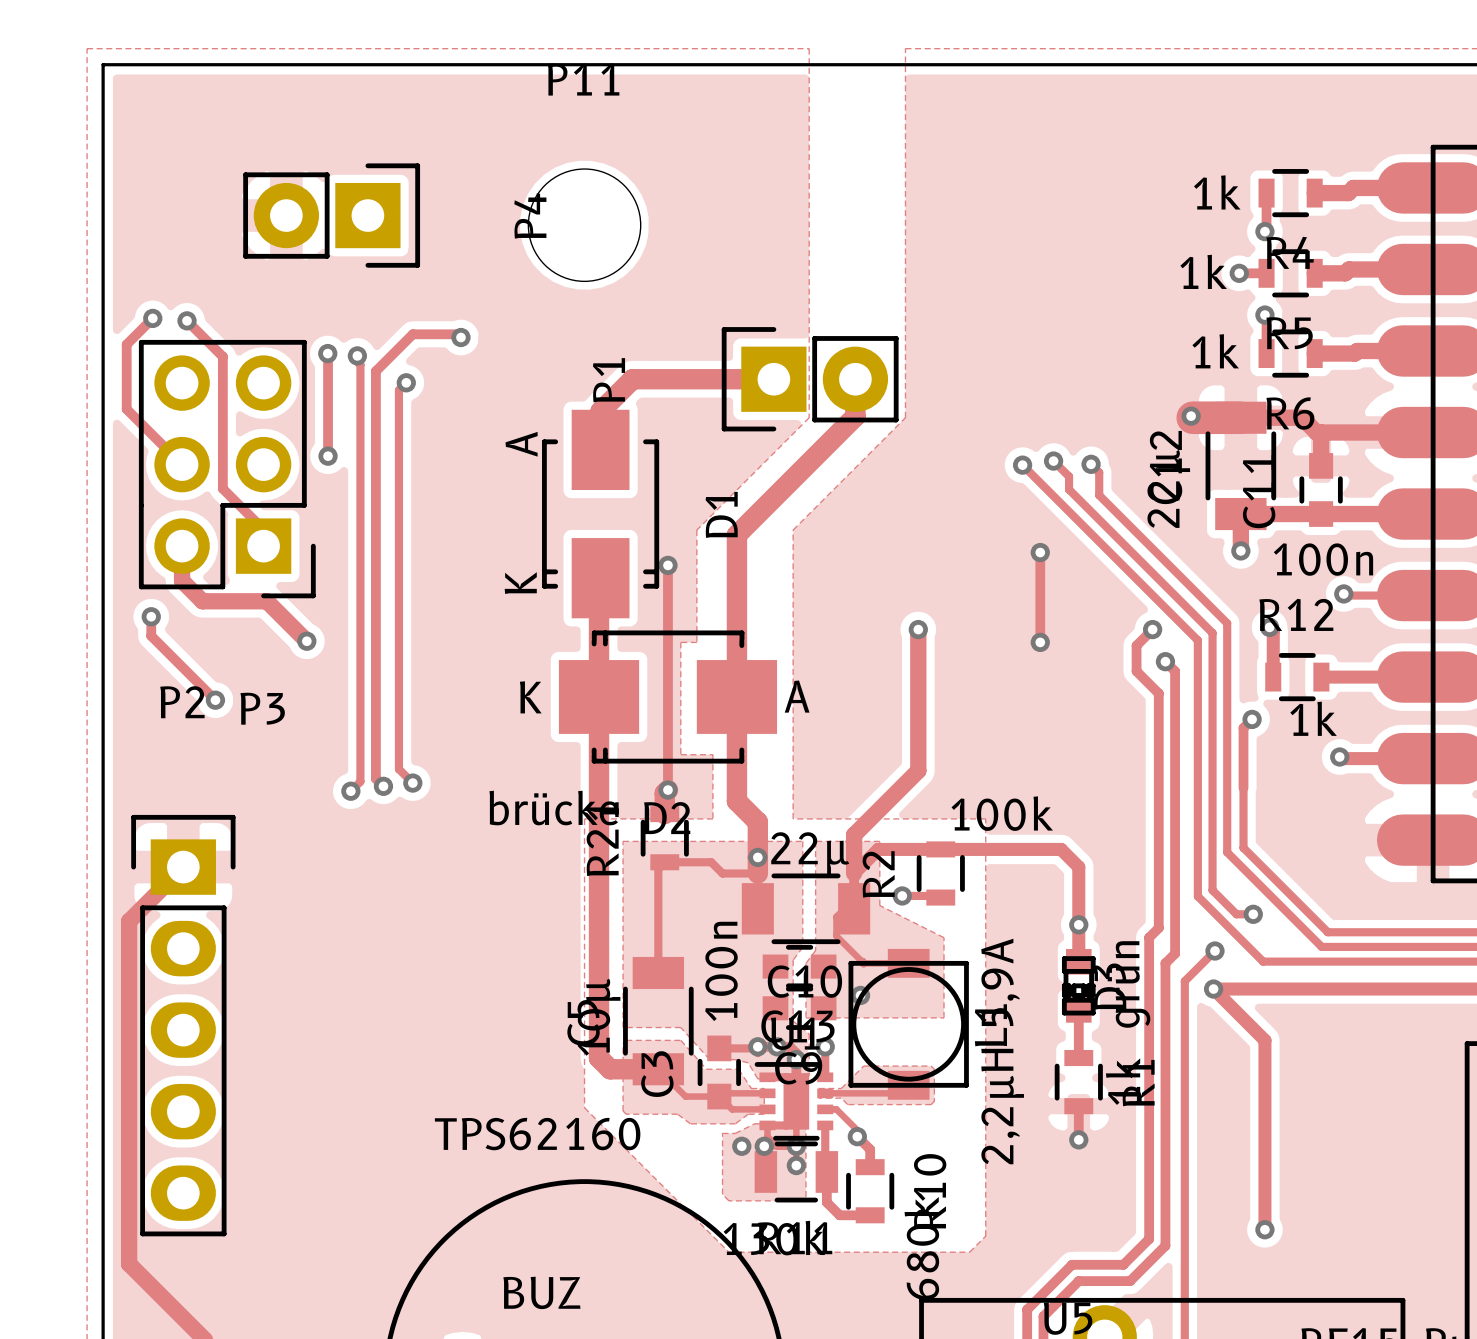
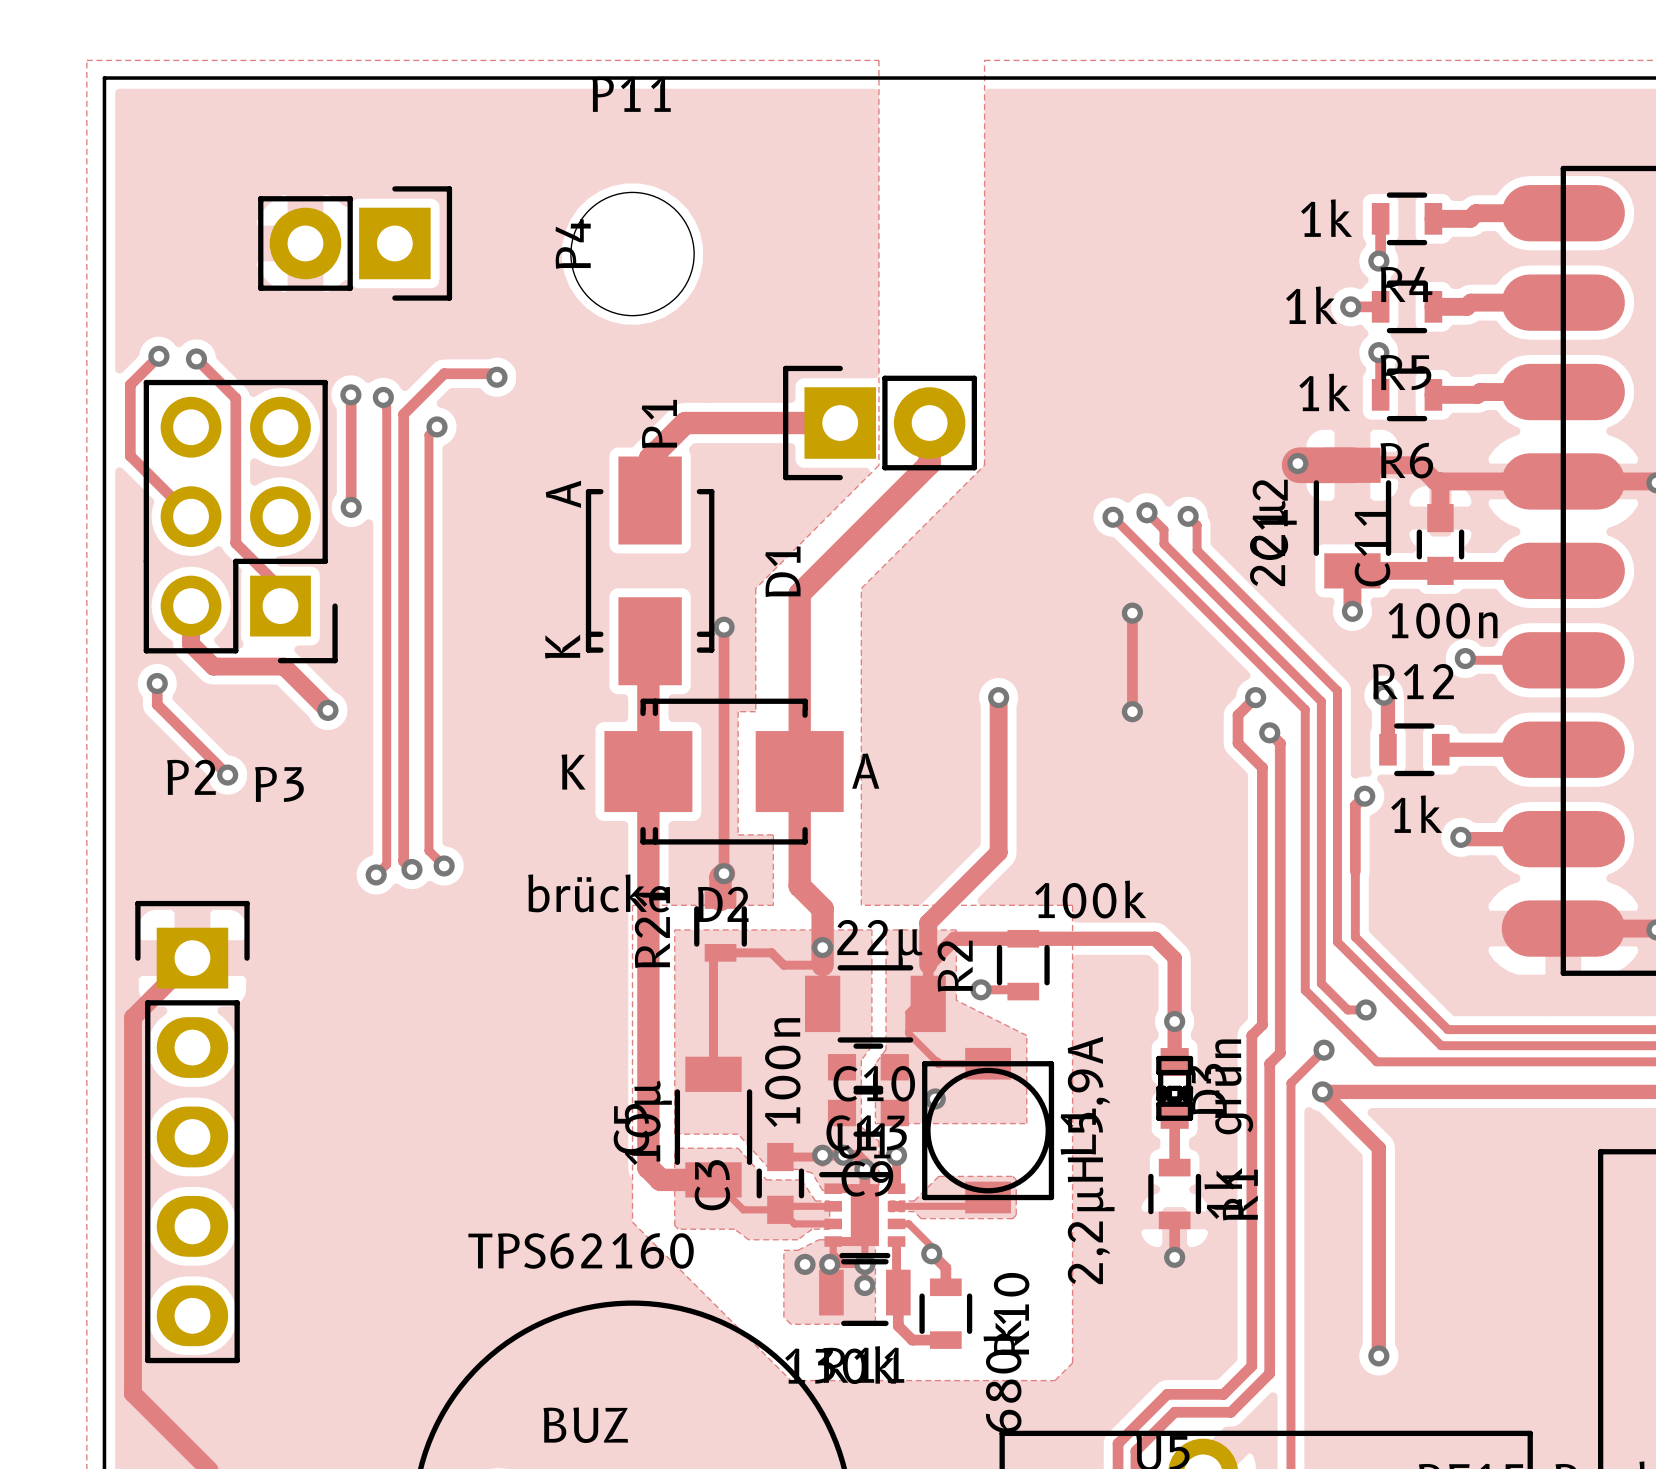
R12 value position: 1k (1313, 718) -> 1k (1416, 814)

